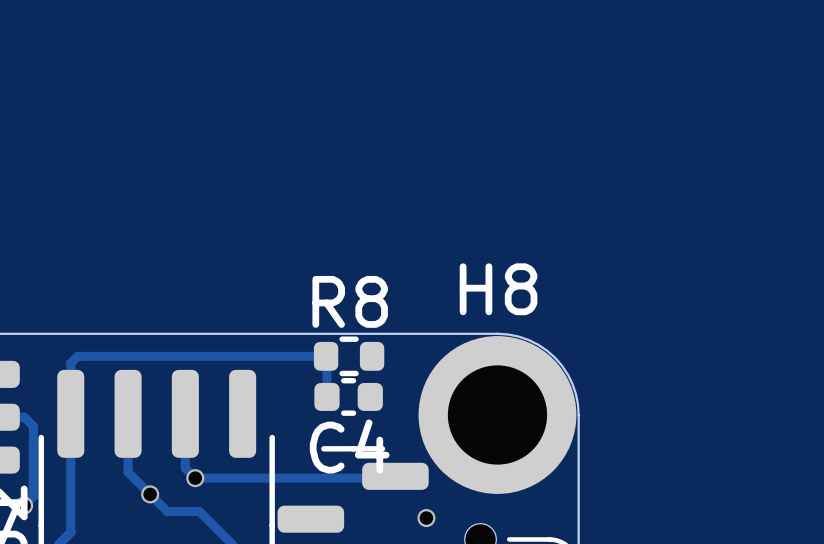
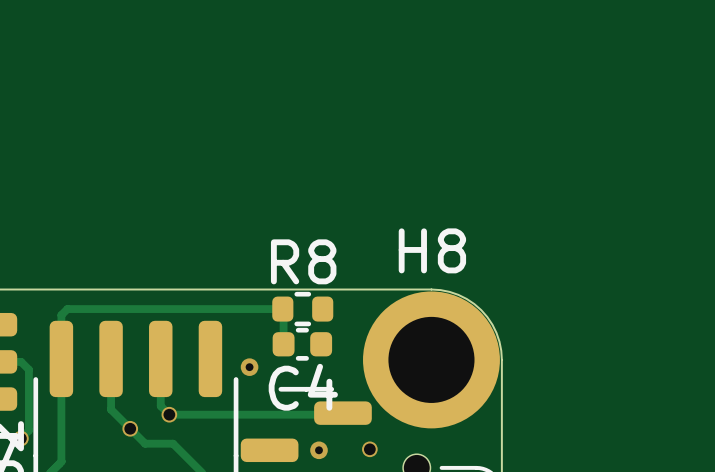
via: none -> (249, 367)
via: none -> (319, 450)

